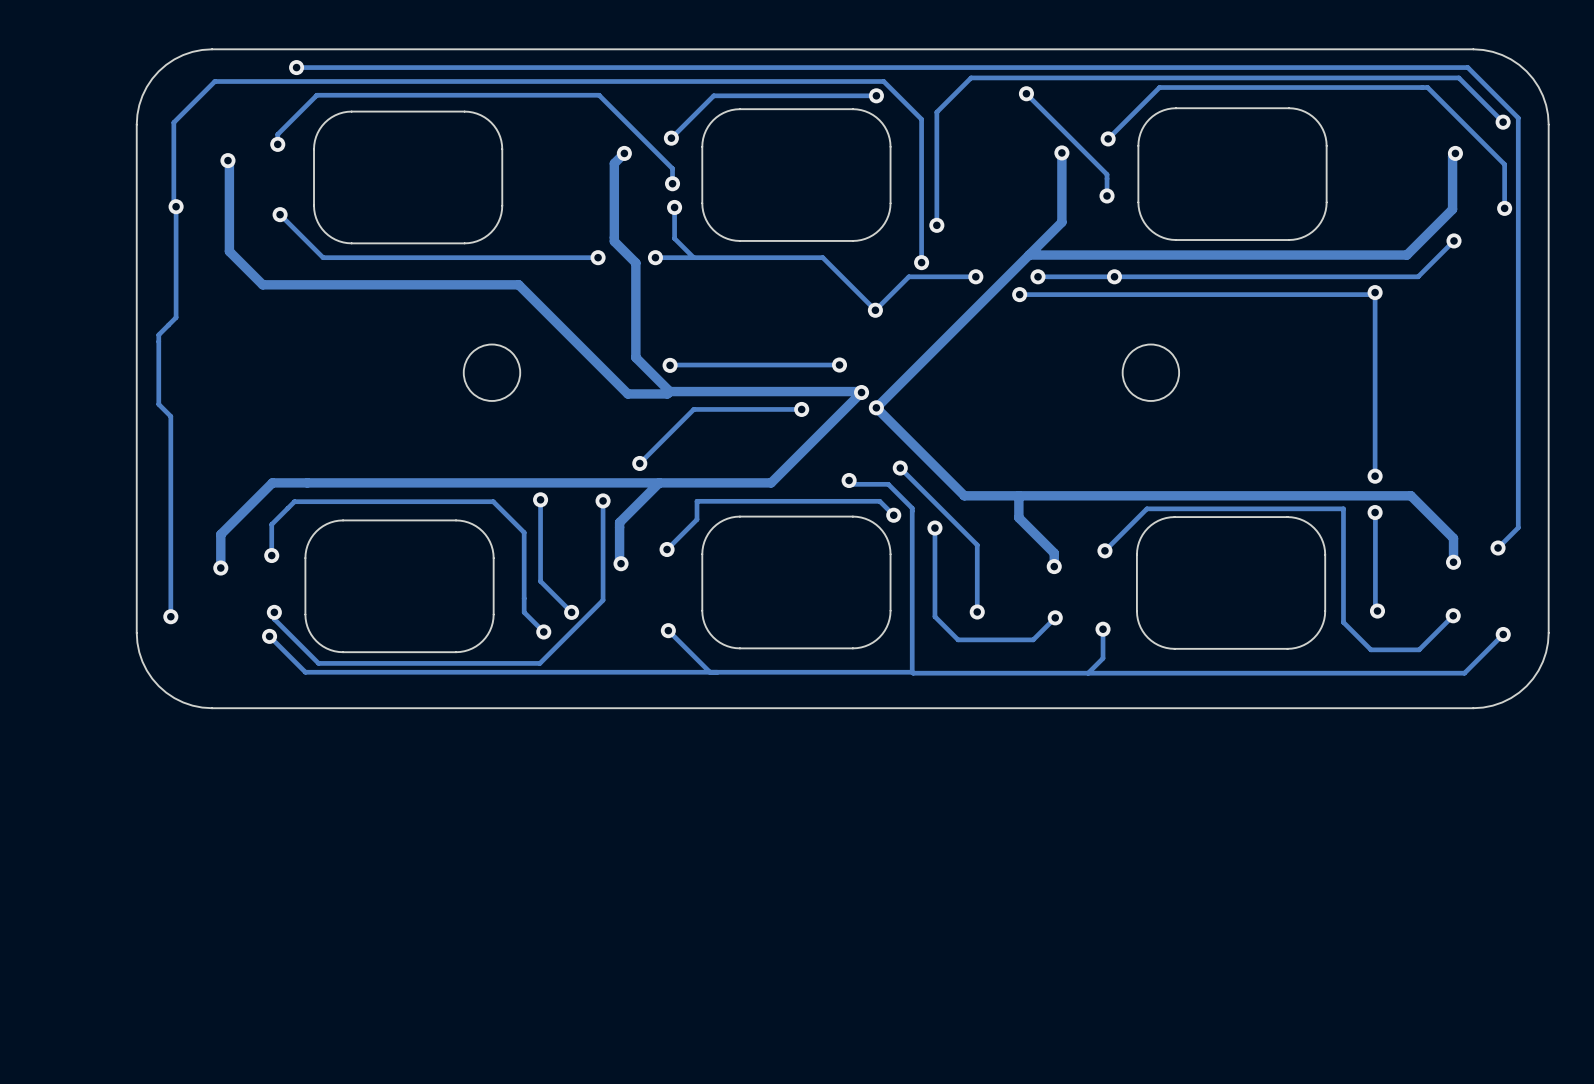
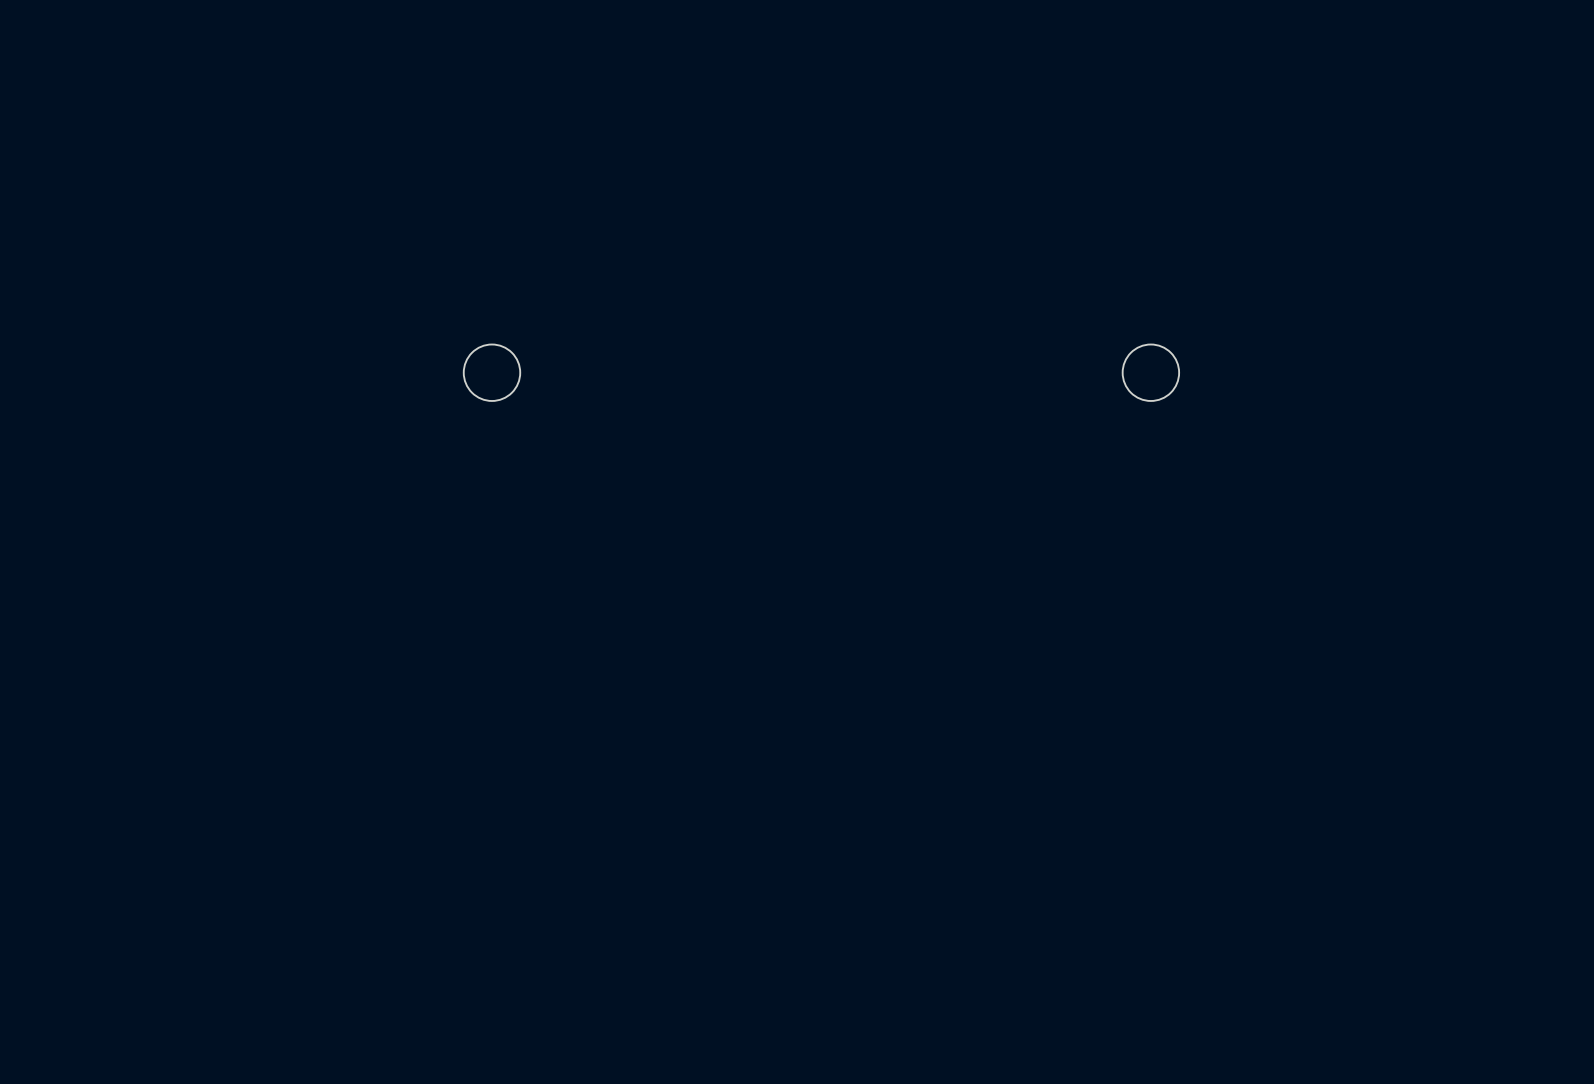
board edge: (1473, 49) (212, 49) (183, 55) (166, 64) (152, 78) (142, 95) (137, 114) (136, 632) (142, 661) (152, 678) (166, 692) (183, 702) (212, 708) (1473, 708) (1502, 702) (1519, 692) (1533, 678) (1542, 661) (1548, 642) (1548, 124) (1542, 95) (1526, 71) (1502, 55) (1473, 49) -> none
track: (296, 67) (1467, 67) (1518, 118) (1518, 527) (1498, 548) -> none
via: (296, 67) -> none
track: (1026, 93) (1107, 174) (1107, 195) -> none
via: (1026, 93) -> none
track: (876, 95) (713, 95) (671, 138) -> none
via: (876, 95) -> none
board edge: (1288, 108) (1171, 108) (1152, 116) (1142, 129) (1138, 145) (1138, 206) (1146, 225) (1159, 236) (1176, 240) (1293, 239) (1312, 231) (1320, 222) (1326, 206) (1325, 137) (1320, 125) (1312, 116) (1301, 110) (1288, 108) -> none
board edge: (852, 109) (735, 109) (716, 117) (706, 130) (702, 146) (702, 207) (710, 226) (723, 237) (739, 240) (857, 240) (876, 232) (886, 219) (890, 207) (889, 138) (884, 126) (876, 117) (865, 111) (852, 109) -> none
board edge: (464, 111) (347, 111) (328, 119) (317, 132) (314, 149) (314, 209) (322, 229) (335, 239) (351, 243) (468, 243) (488, 235) (498, 222) (502, 209) (501, 140) (496, 129) (488, 119) (477, 113) (464, 111) -> none
track: (1503, 122) (1458, 77) (971, 77) (936, 112) (936, 225) -> none
via: (1503, 122) -> none
via: (671, 138) -> none
track: (1108, 138) (1159, 87) (1427, 87) (1504, 164) (1504, 208) -> none
via: (1108, 138) -> none
track: (277, 144) (277, 134) (316, 95) (599, 95) (672, 168) (672, 183) -> none
via: (277, 144) -> none
track: (1061, 152) (1061, 222) (876, 407) (964, 495) (1410, 495) (1453, 538) (1453, 562) -> none
via: (1061, 152) -> none
track: (624, 153) (614, 163) (614, 241) (635, 262) (635, 357) (669, 391) -> none
via: (624, 153) -> none
track: (1455, 153) (1452, 156) (1452, 209) (1406, 255) (1029, 255) -> none
via: (1455, 153) -> none
track: (227, 160) (229, 251) (262, 284) (518, 284) (627, 393) (667, 393) (669, 391) -> none
via: (227, 160) -> none
via: (672, 183) -> none
via: (1107, 195) -> none
via: (176, 206) -> none
track: (674, 207) (674, 238) (693, 257) -> none
via: (674, 207) -> none
via: (1504, 208) -> none
track: (280, 214) (323, 257) (598, 257) -> none
via: (280, 214) -> none
via: (936, 225) -> none
track: (1454, 240) (1418, 276) (1037, 276) -> none
via: (1454, 240) -> none
via: (598, 257) -> none
track: (655, 257) (822, 257) (875, 310) (908, 276) (975, 276) -> none
via: (655, 257) -> none
track: (921, 262) (921, 119) (883, 81) (214, 81) (173, 122) (176, 317) (158, 334) (158, 404) (170, 416) (170, 616) -> none
via: (921, 262) -> none
via: (975, 276) -> none
via: (1037, 276) -> none
via: (1114, 276) -> none
via: (1375, 292) -> none
track: (1019, 294) (1373, 294) (1375, 292) (1375, 476) -> none
via: (1019, 294) -> none
via: (875, 310) -> none
via: (670, 365) -> none
track: (839, 365) (670, 365) -> none
via: (839, 365) -> none
track: (669, 391) (861, 392) (771, 482) (272, 482) (220, 534) (220, 568) -> none
via: (861, 392) -> none
via: (876, 407) -> none
track: (801, 409) (693, 409) (639, 463) -> none
via: (801, 409) -> none
via: (639, 463) -> none
track: (900, 468) (977, 545) (977, 612) -> none
via: (900, 468) -> none
via: (1375, 476) -> none
track: (849, 480) (852, 484) (888, 484) (912, 508) (912, 672) -> none
via: (849, 480) -> none
track: (659, 482) (619, 522) (621, 563) -> none
track: (1018, 495) (1018, 517) (1054, 553) (1054, 566) -> none
track: (540, 499) (540, 581) (571, 612) -> none
via: (540, 499) -> none
track: (603, 500) (603, 600) (539, 663) (318, 663) (274, 619) (274, 612) -> none
via: (603, 500) -> none
track: (1375, 512) (1375, 608) (1377, 611) -> none
via: (1375, 512) -> none
track: (893, 515) (879, 501) (697, 501) (697, 519) (667, 549) -> none
via: (893, 515) -> none
board edge: (852, 516) (735, 516) (716, 524) (706, 537) (702, 554) (702, 614) (710, 634) (723, 644) (739, 648) (857, 648) (876, 640) (886, 627) (890, 614) (889, 545) (884, 534) (876, 524) (865, 518) (852, 516) -> none
board edge: (1287, 517) (1170, 517) (1151, 525) (1140, 538) (1136, 554) (1137, 615) (1145, 634) (1158, 645) (1174, 648) (1291, 648) (1311, 640) (1319, 631) (1324, 615) (1324, 546) (1319, 534) (1311, 525) (1299, 519) (1287, 517) -> none
board edge: (456, 520) (338, 520) (319, 528) (309, 541) (305, 558) (305, 618) (313, 638) (326, 648) (343, 652) (460, 651) (479, 643) (487, 634) (493, 618) (492, 549) (487, 538) (479, 528) (468, 522) (456, 520) -> none
track: (934, 528) (934, 616) (958, 639) (1033, 639) (1055, 617) -> none
via: (934, 528) -> none
via: (1498, 548) -> none
via: (667, 549) -> none
track: (1104, 550) (1146, 508) (1343, 508) (1343, 622) (1370, 649) (1419, 649) (1453, 615) -> none
via: (1104, 550) -> none
track: (271, 555) (271, 524) (294, 501) (493, 501) (524, 532) (524, 612) (543, 631) -> none
via: (271, 555) -> none
via: (1453, 562) -> none
via: (621, 563) -> none
via: (1054, 566) -> none
via: (220, 568) -> none
via: (1377, 611) -> none
via: (274, 612) -> none
via: (571, 612) -> none
via: (977, 612) -> none
via: (1453, 615) -> none
via: (170, 616) -> none
via: (1055, 617) -> none
track: (1103, 629) (1103, 658) (1088, 673) -> none
via: (1103, 629) -> none
track: (668, 630) (709, 672) -> none
via: (668, 630) -> none
via: (543, 631) -> none
track: (1503, 634) (1464, 673) (912, 672) -> none
via: (1503, 634) -> none
track: (269, 636) (305, 672) (912, 672) -> none
via: (269, 636) -> none

